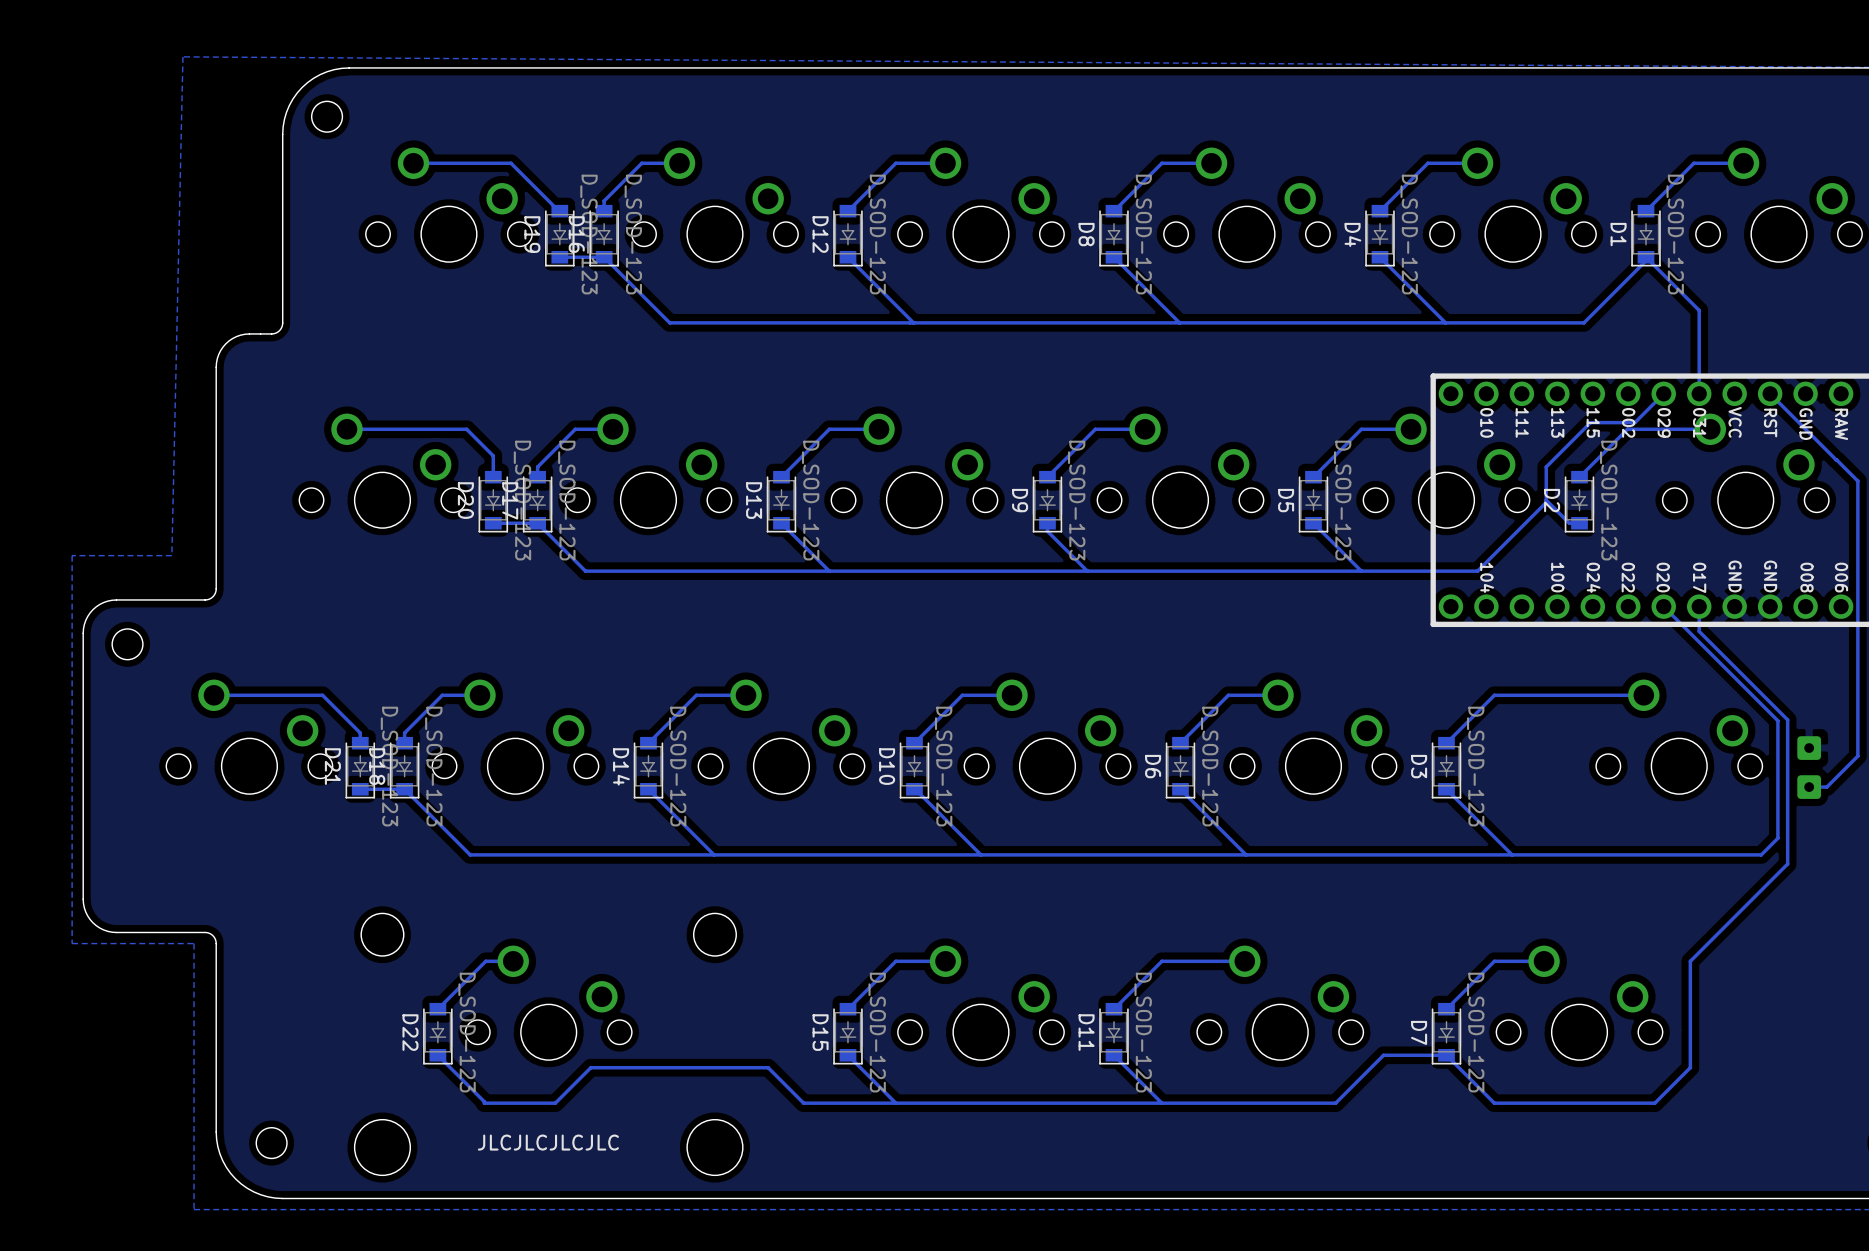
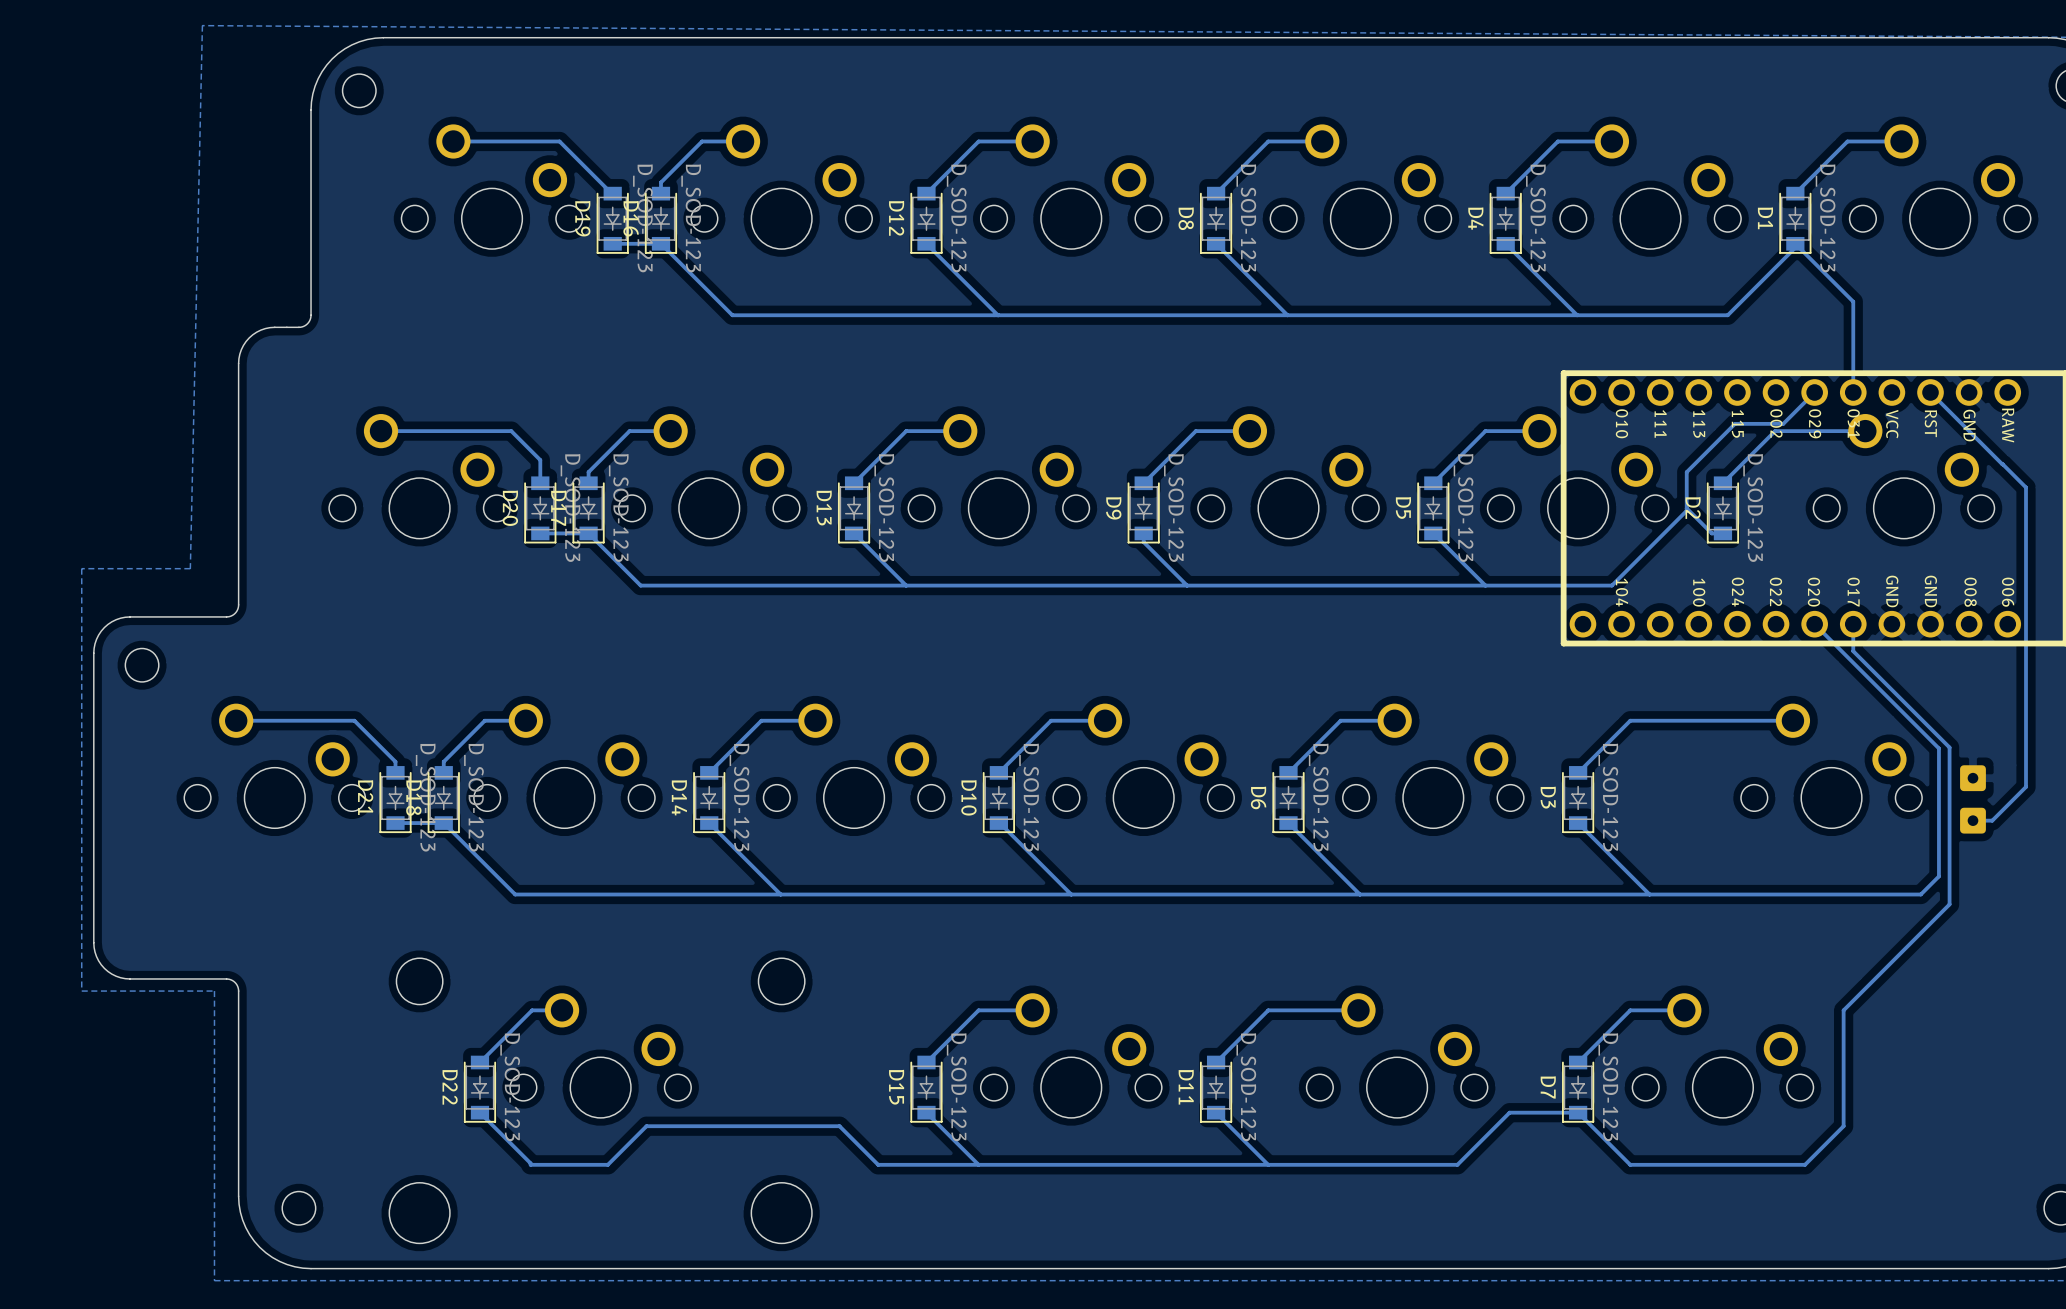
text: JLCJLCJLCJLC (548, 1142) -> none

